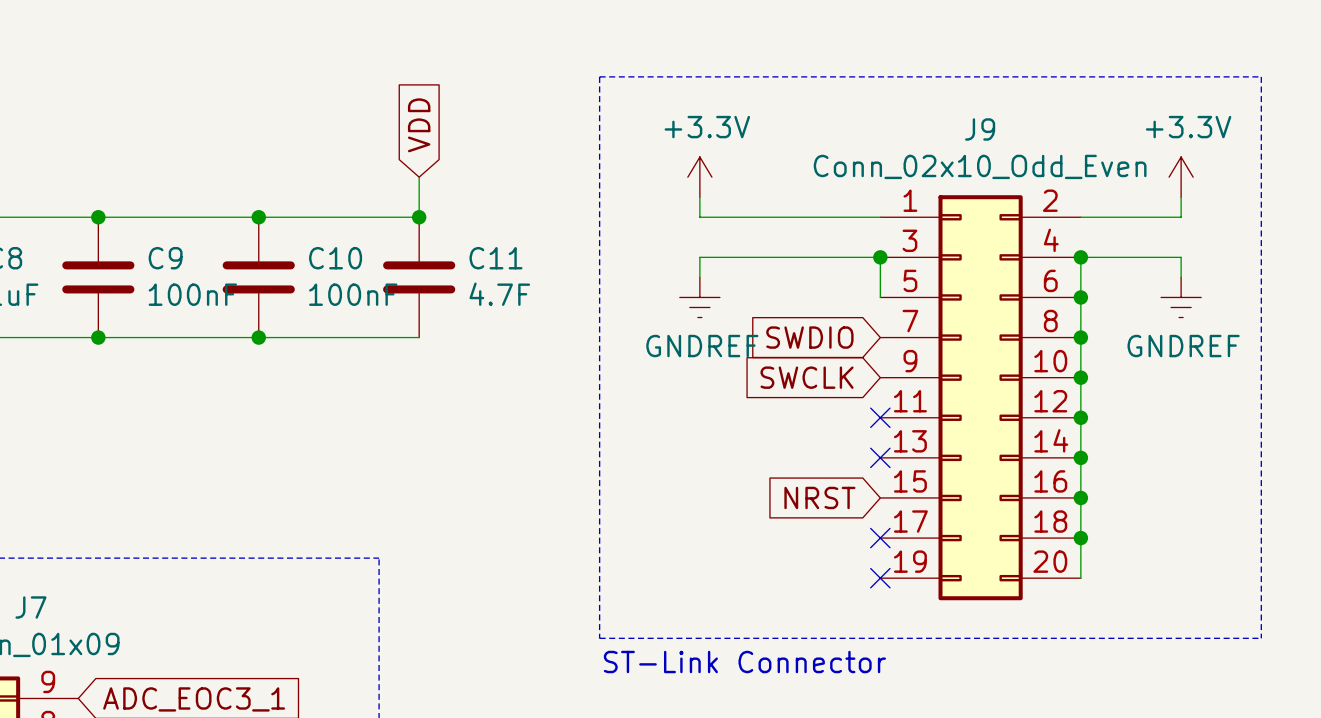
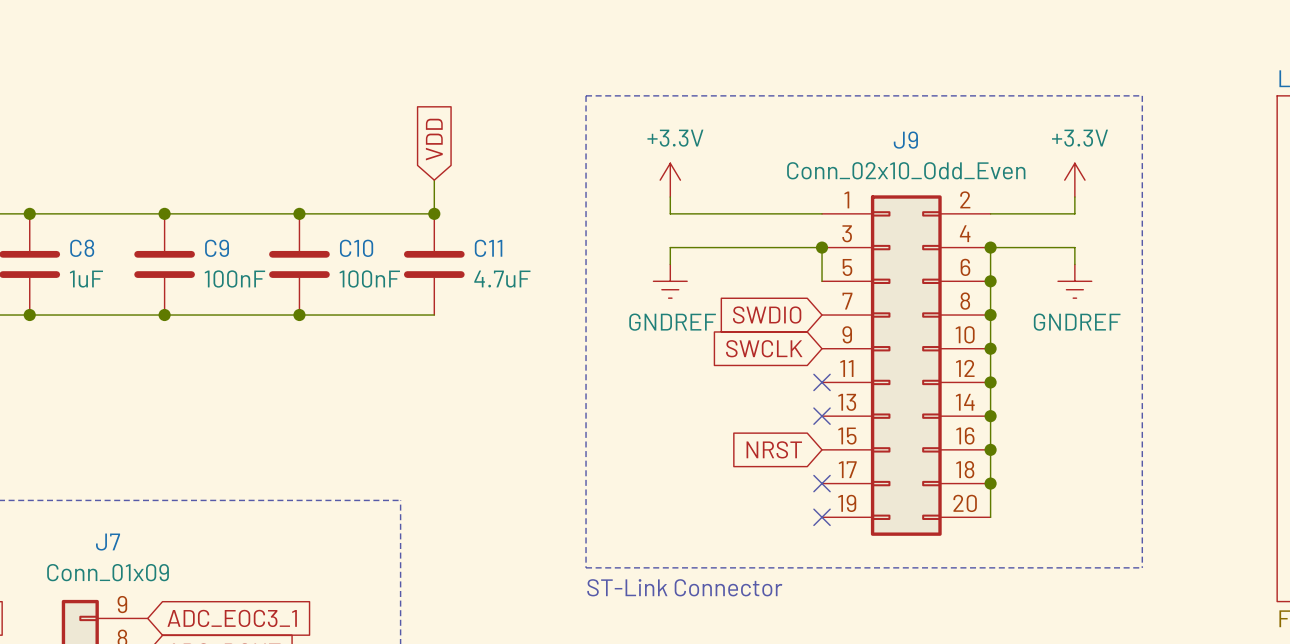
C11 value: 4.7F (499, 294) -> 4.7uF (502, 279)

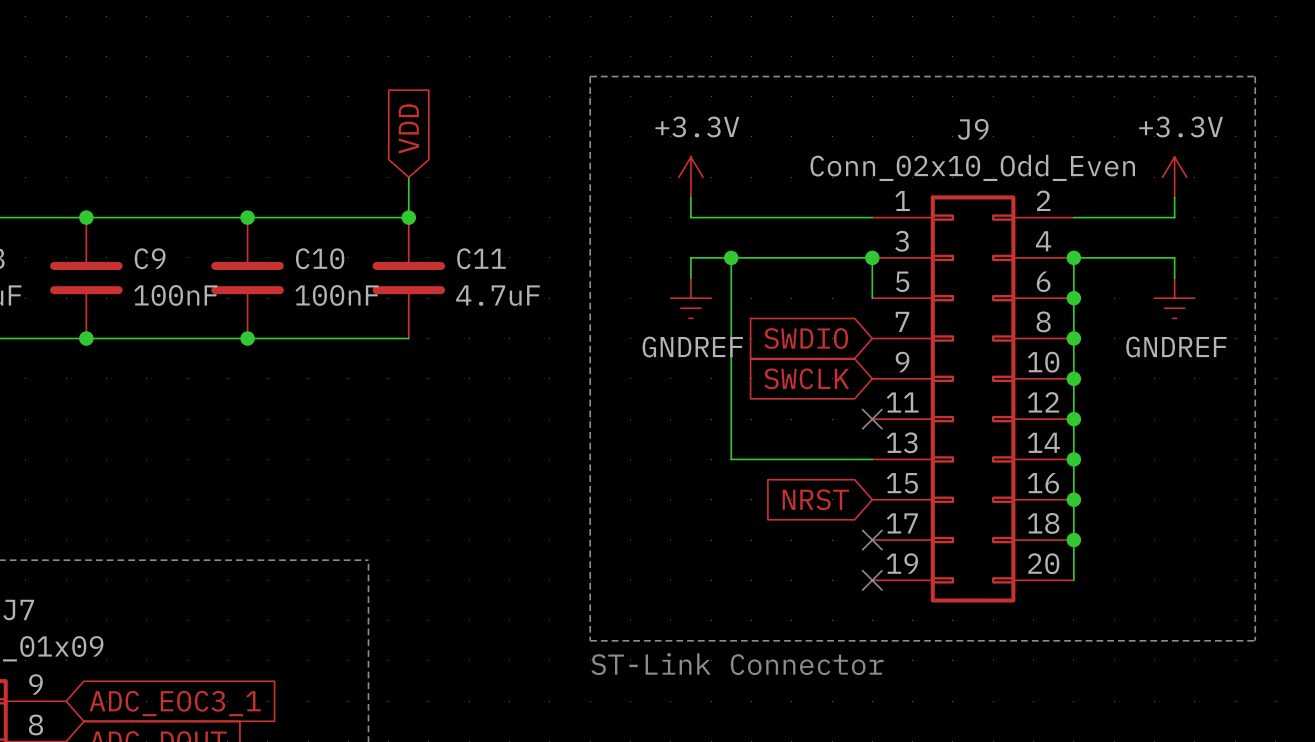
wire: none -> (731, 257) (731, 459) (872, 459)
junction: none -> (731, 257)
no-connect mark: (822, 416) -> none

